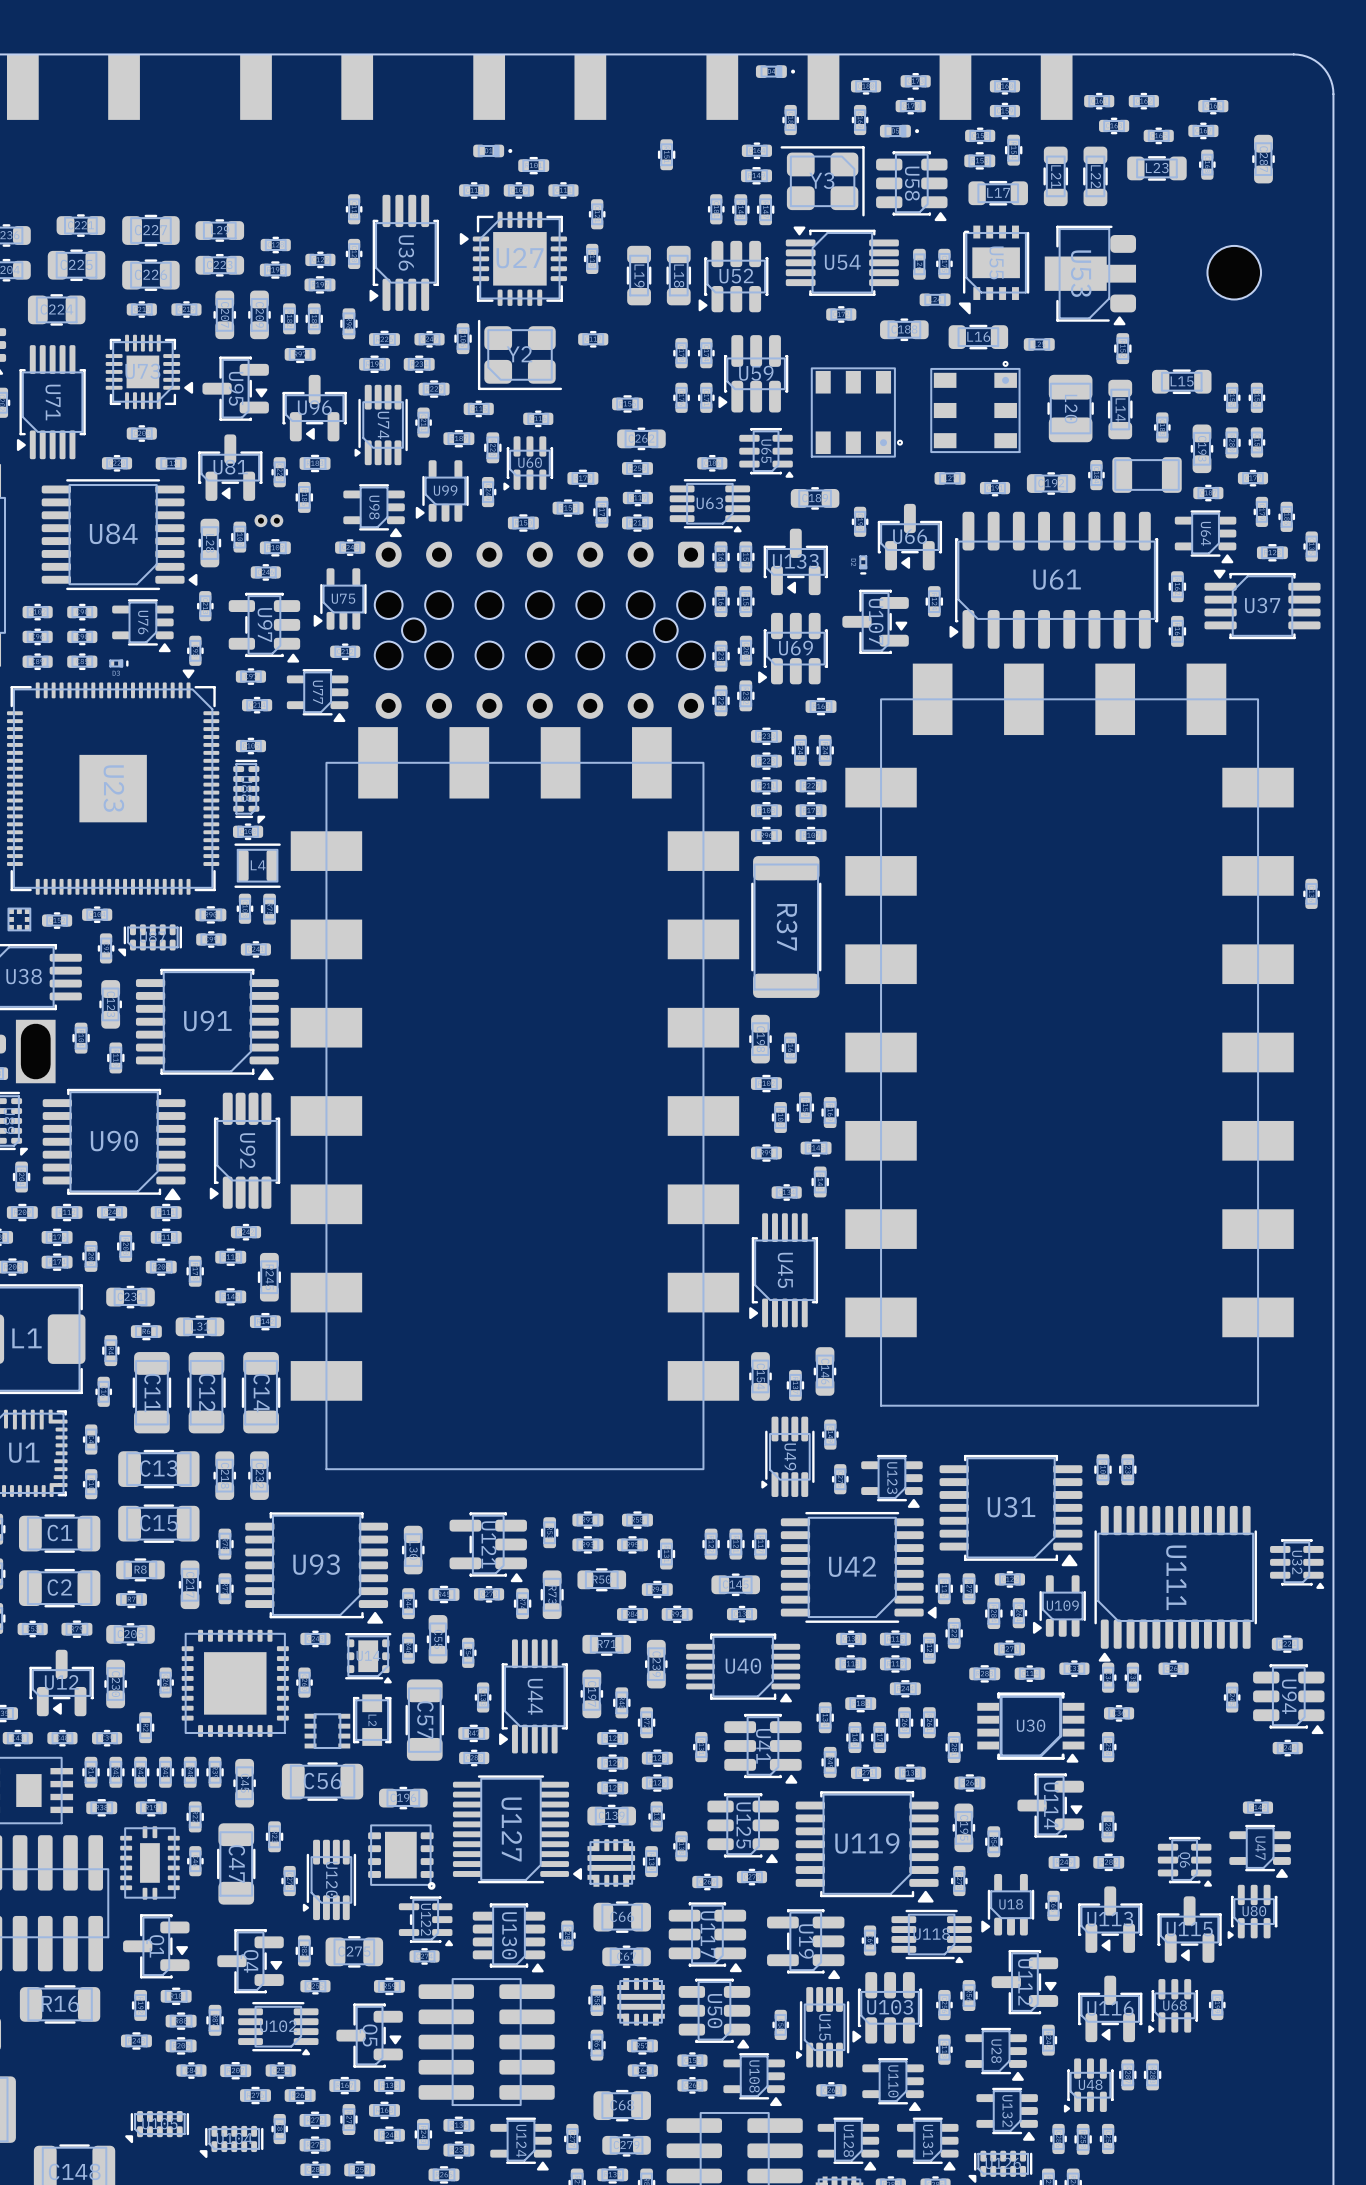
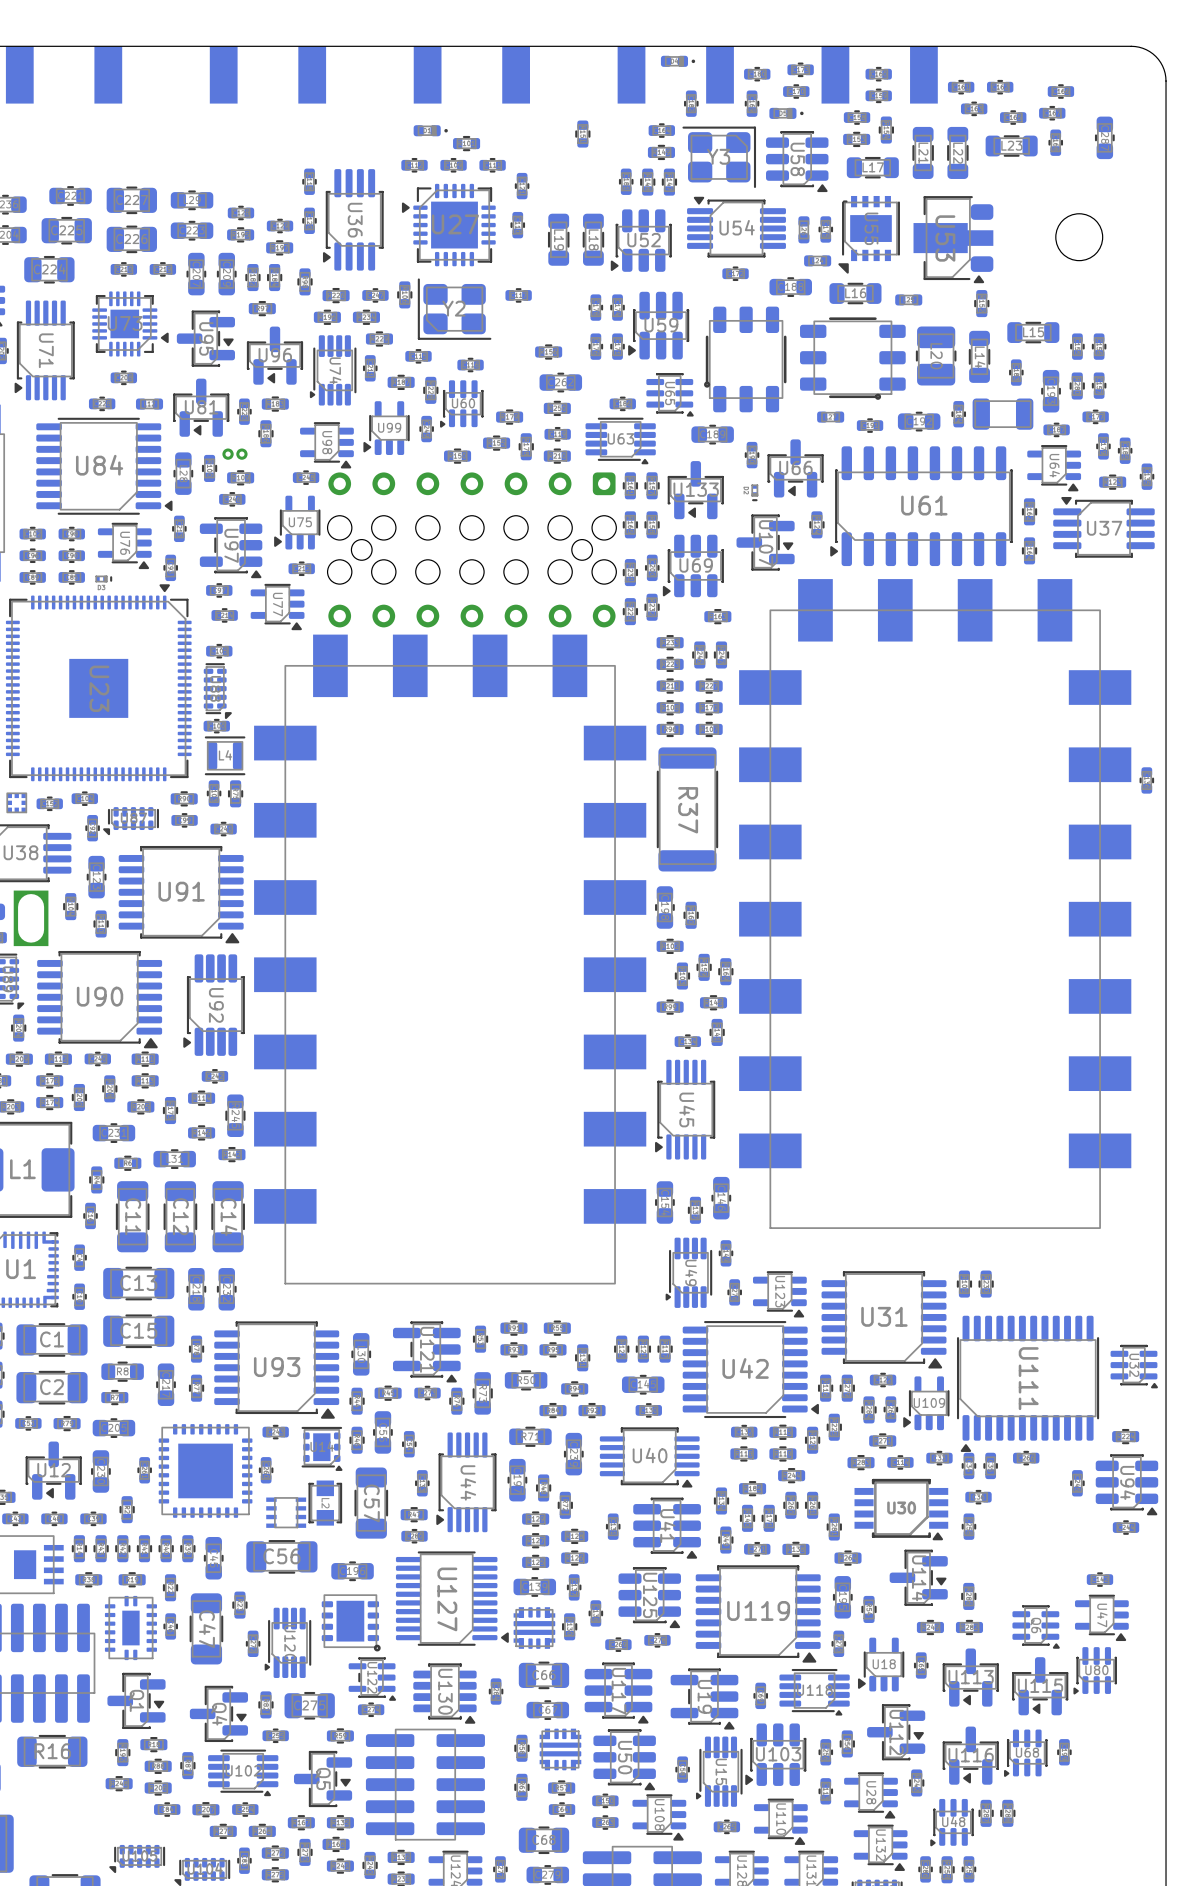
part footprint: [930, 360, 1021, 454] -> [800, 317, 906, 400]
part footprint: [810, 367, 903, 458] -> [704, 306, 787, 413]

